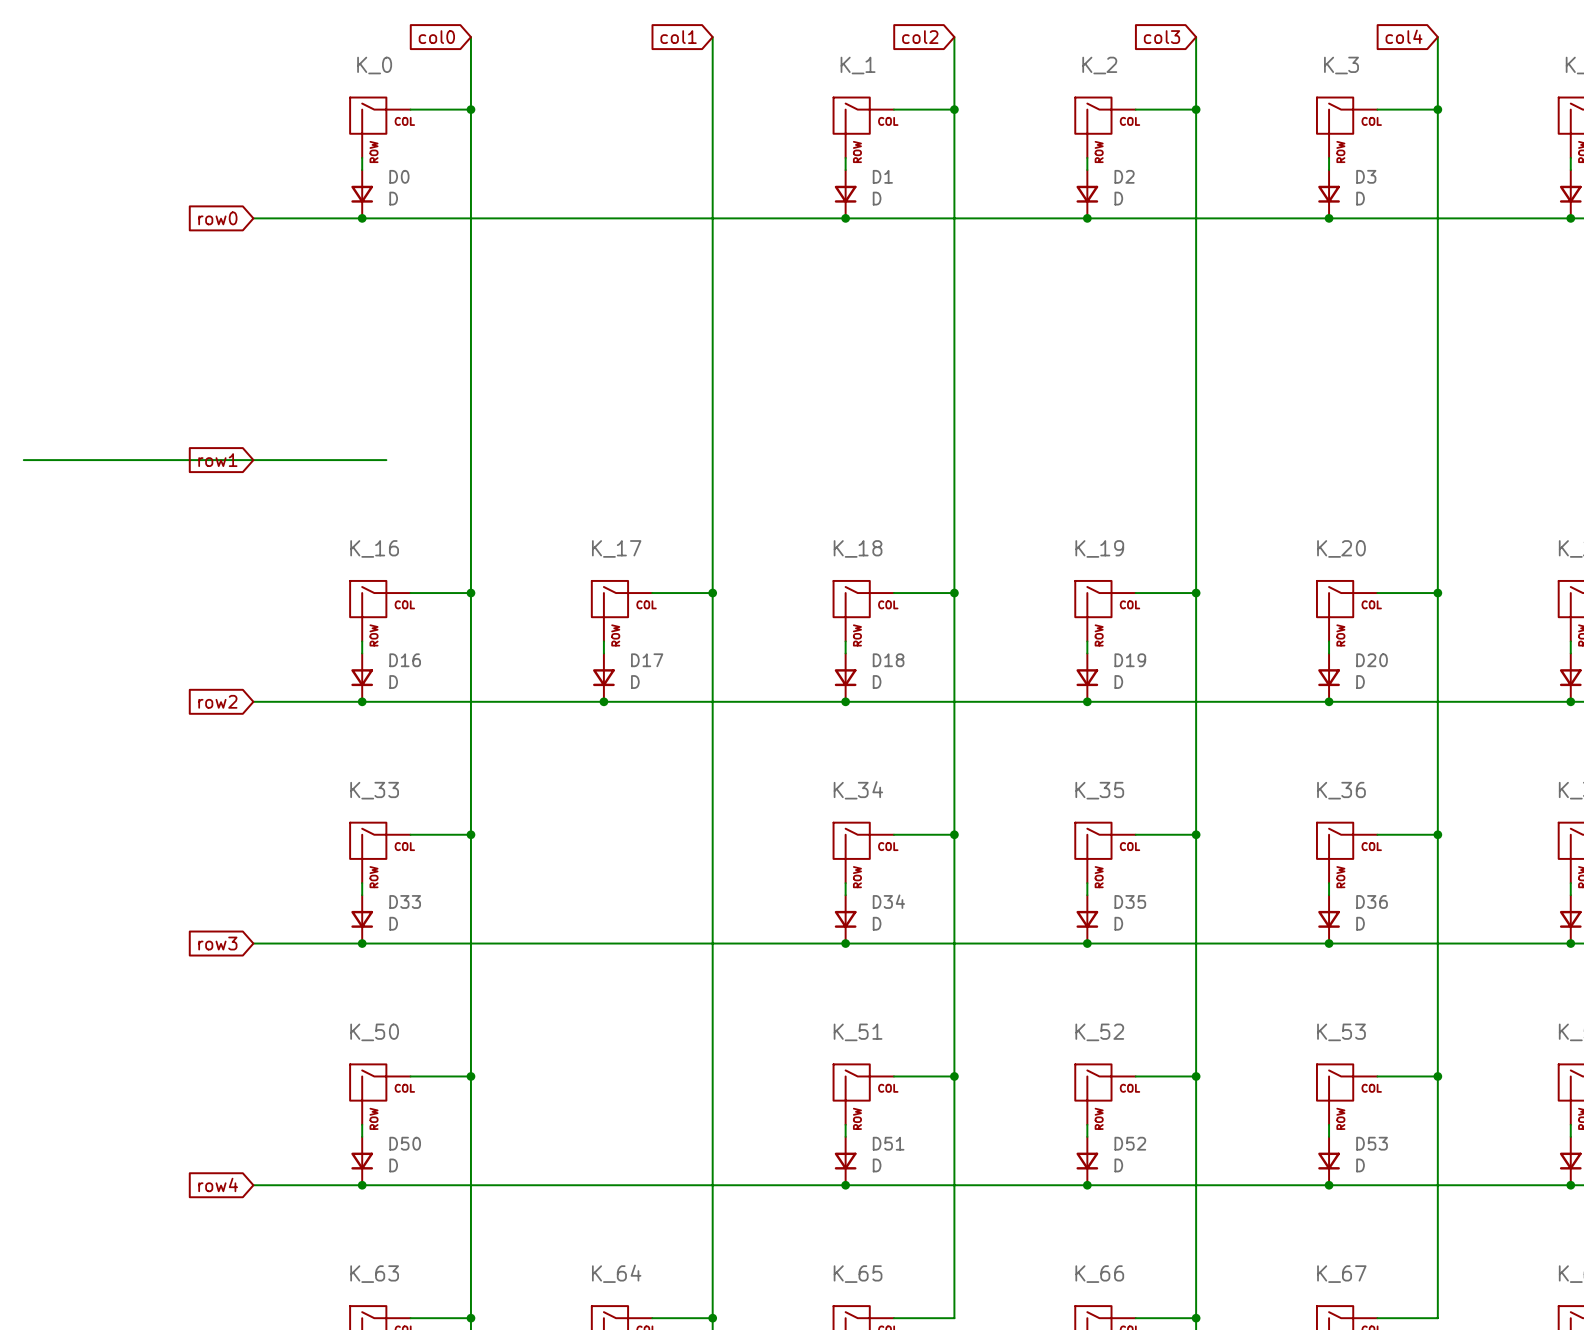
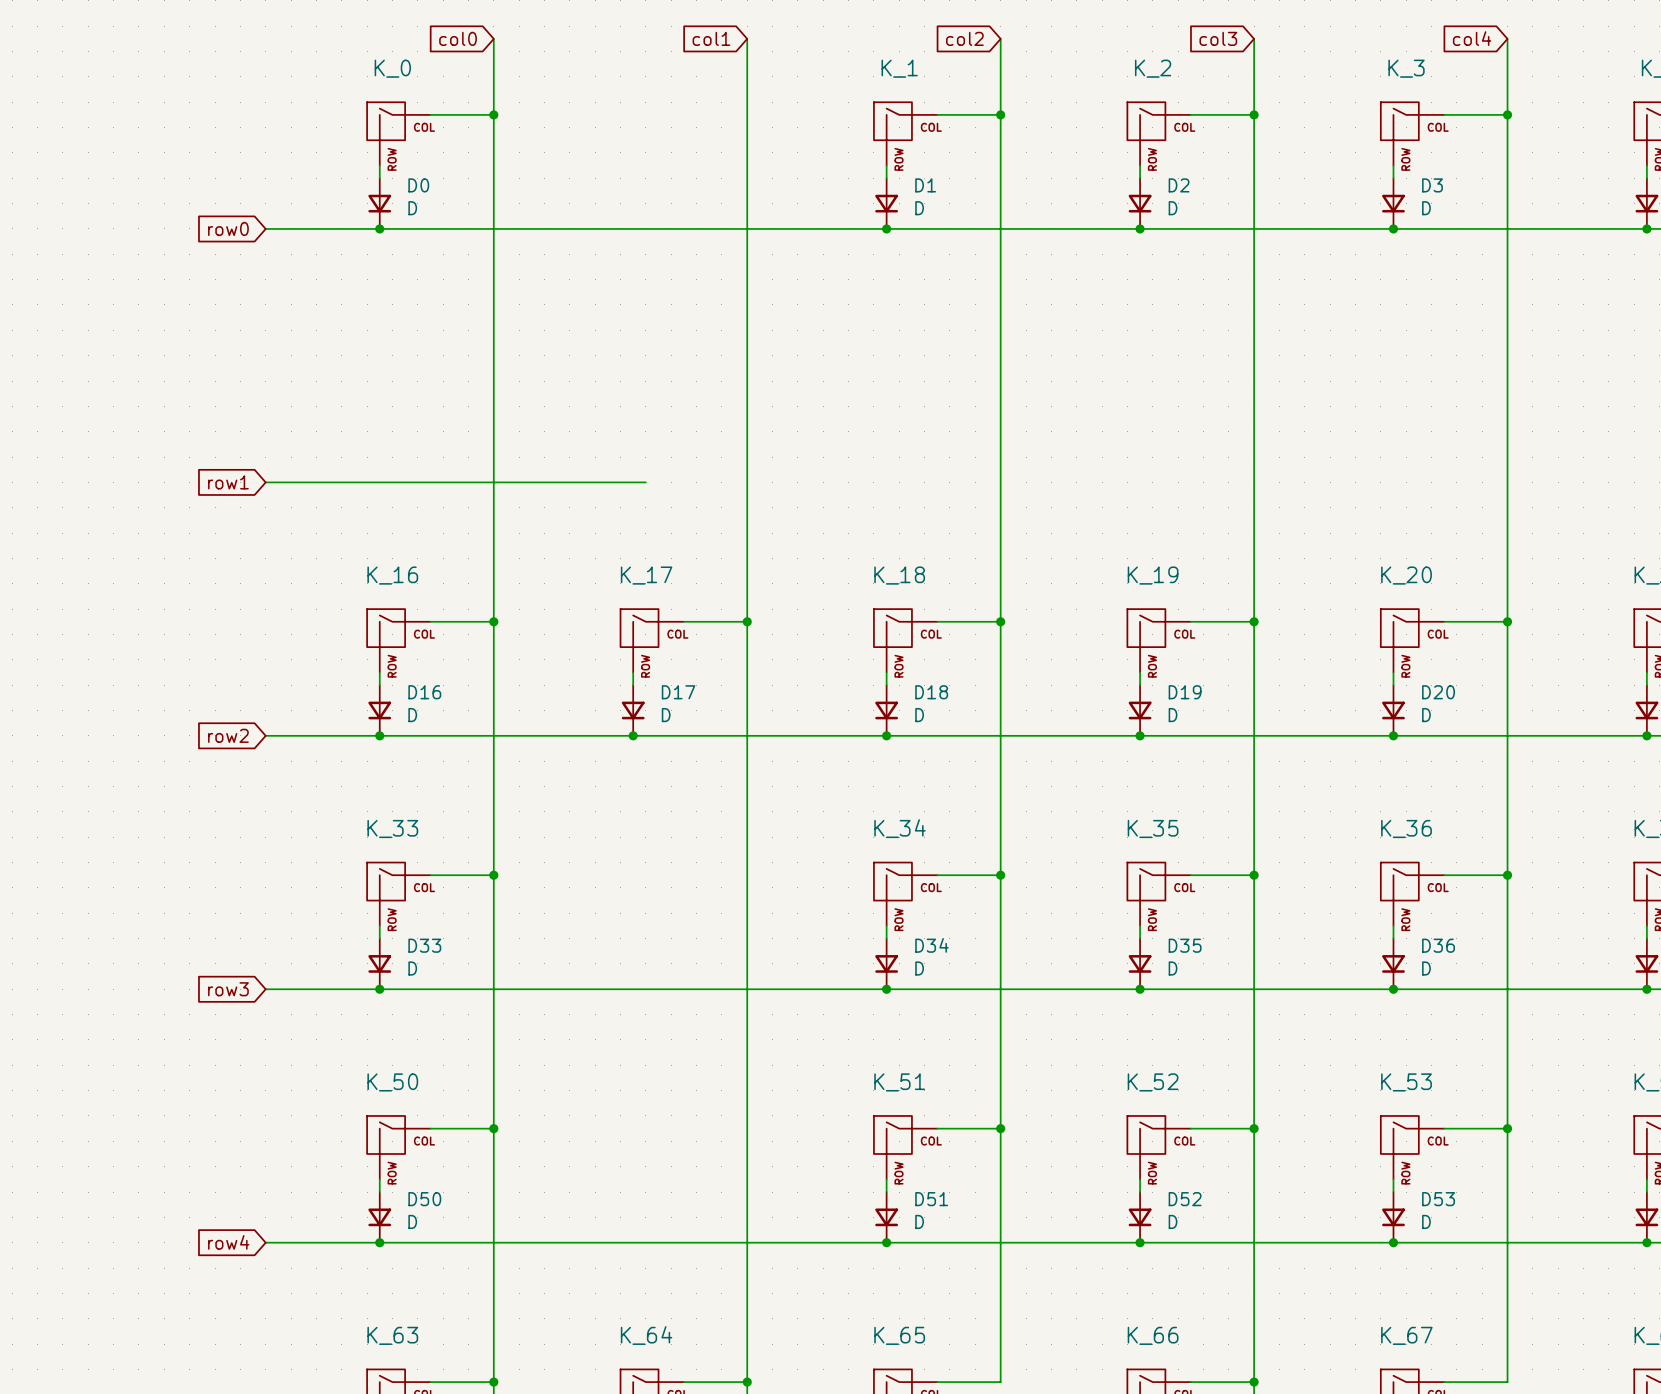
wire: (23, 460) (253, 460) -> none
wire: none -> (405, 482) (645, 482)

